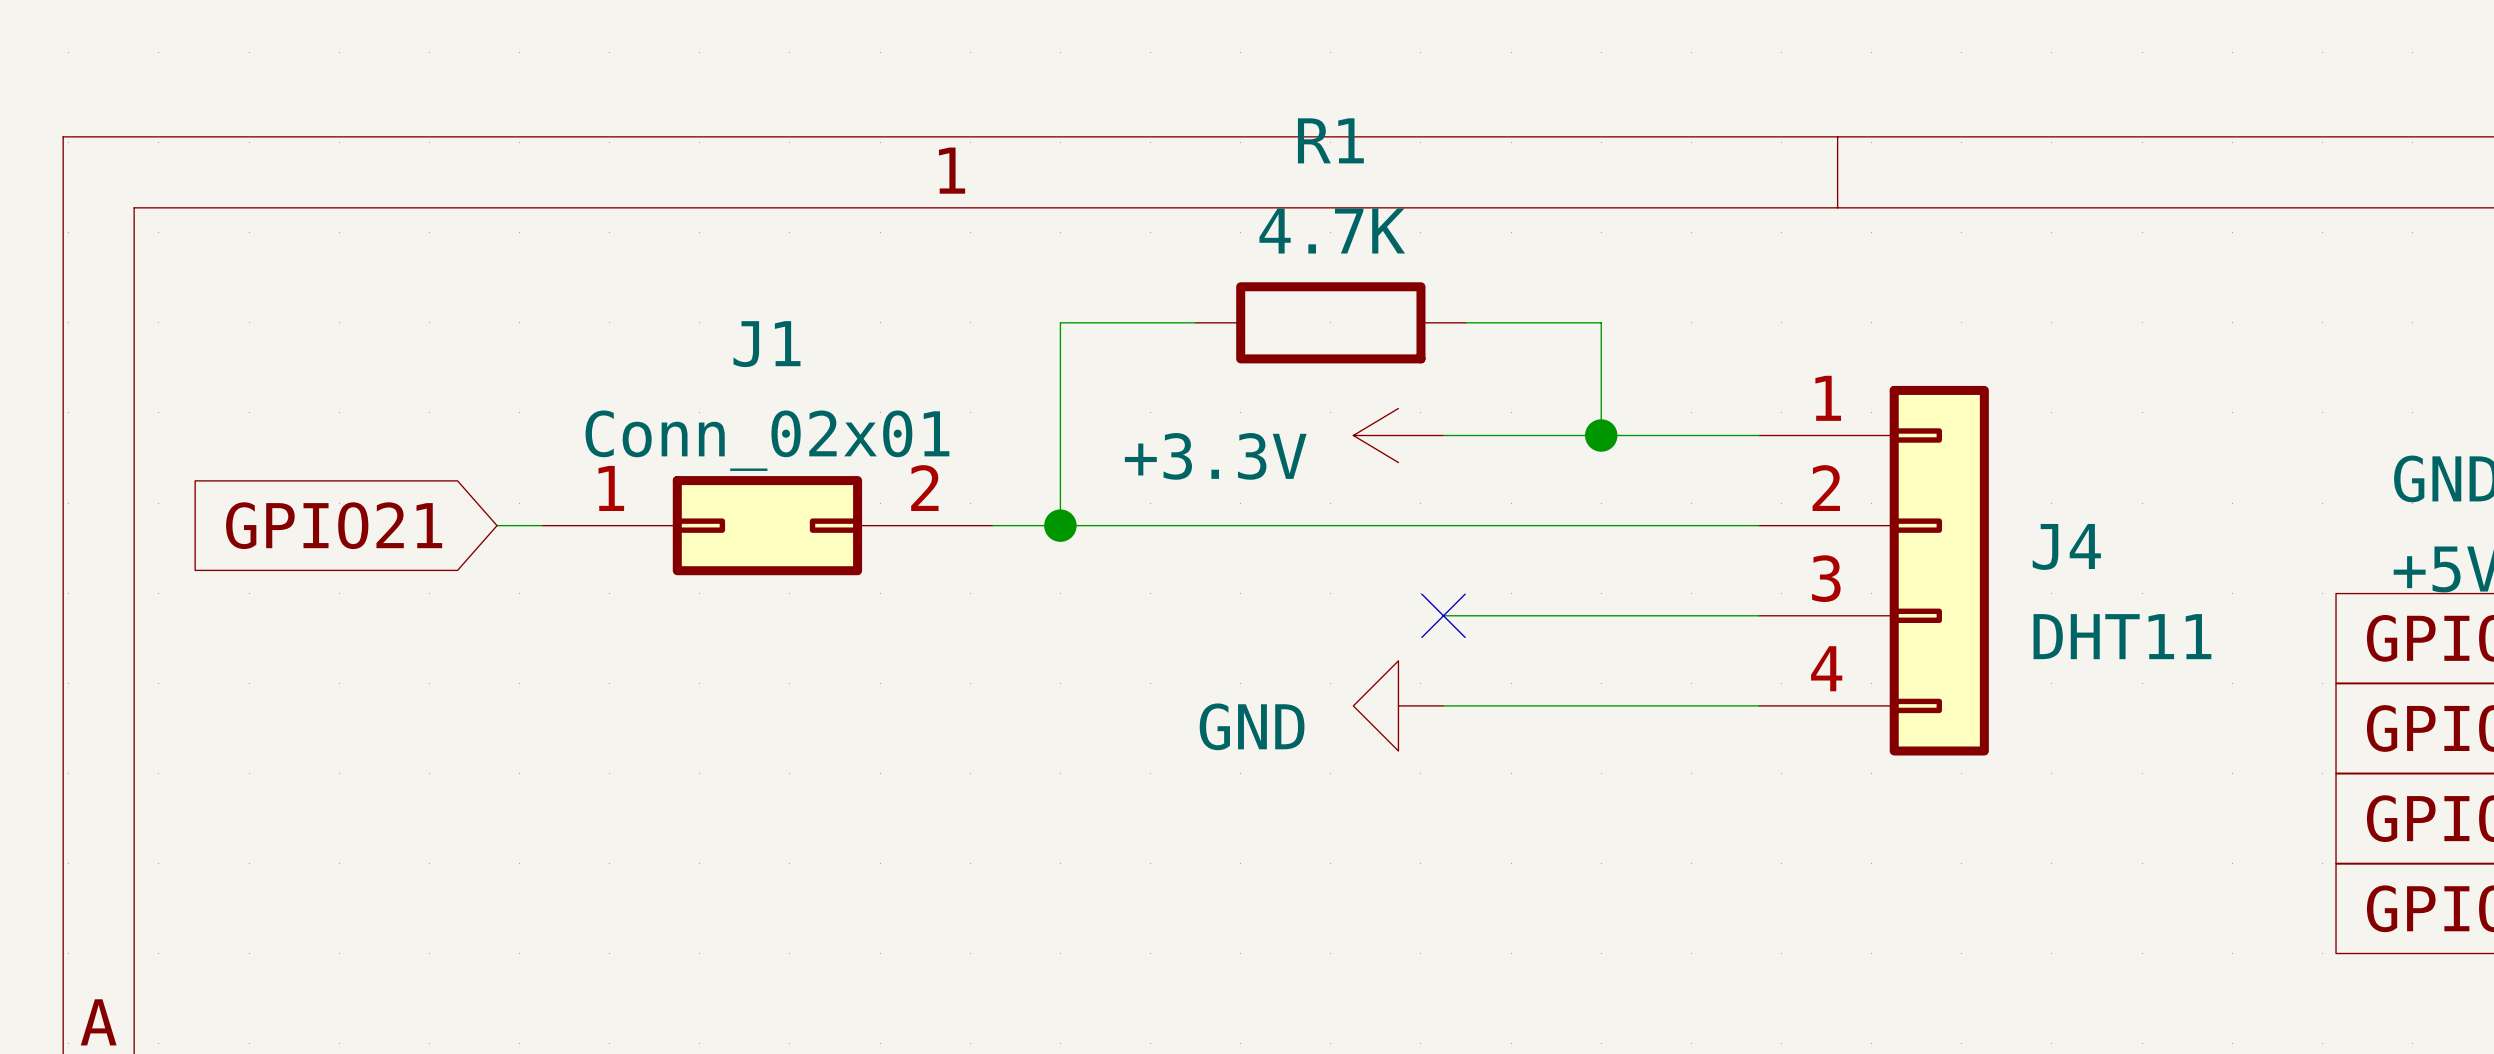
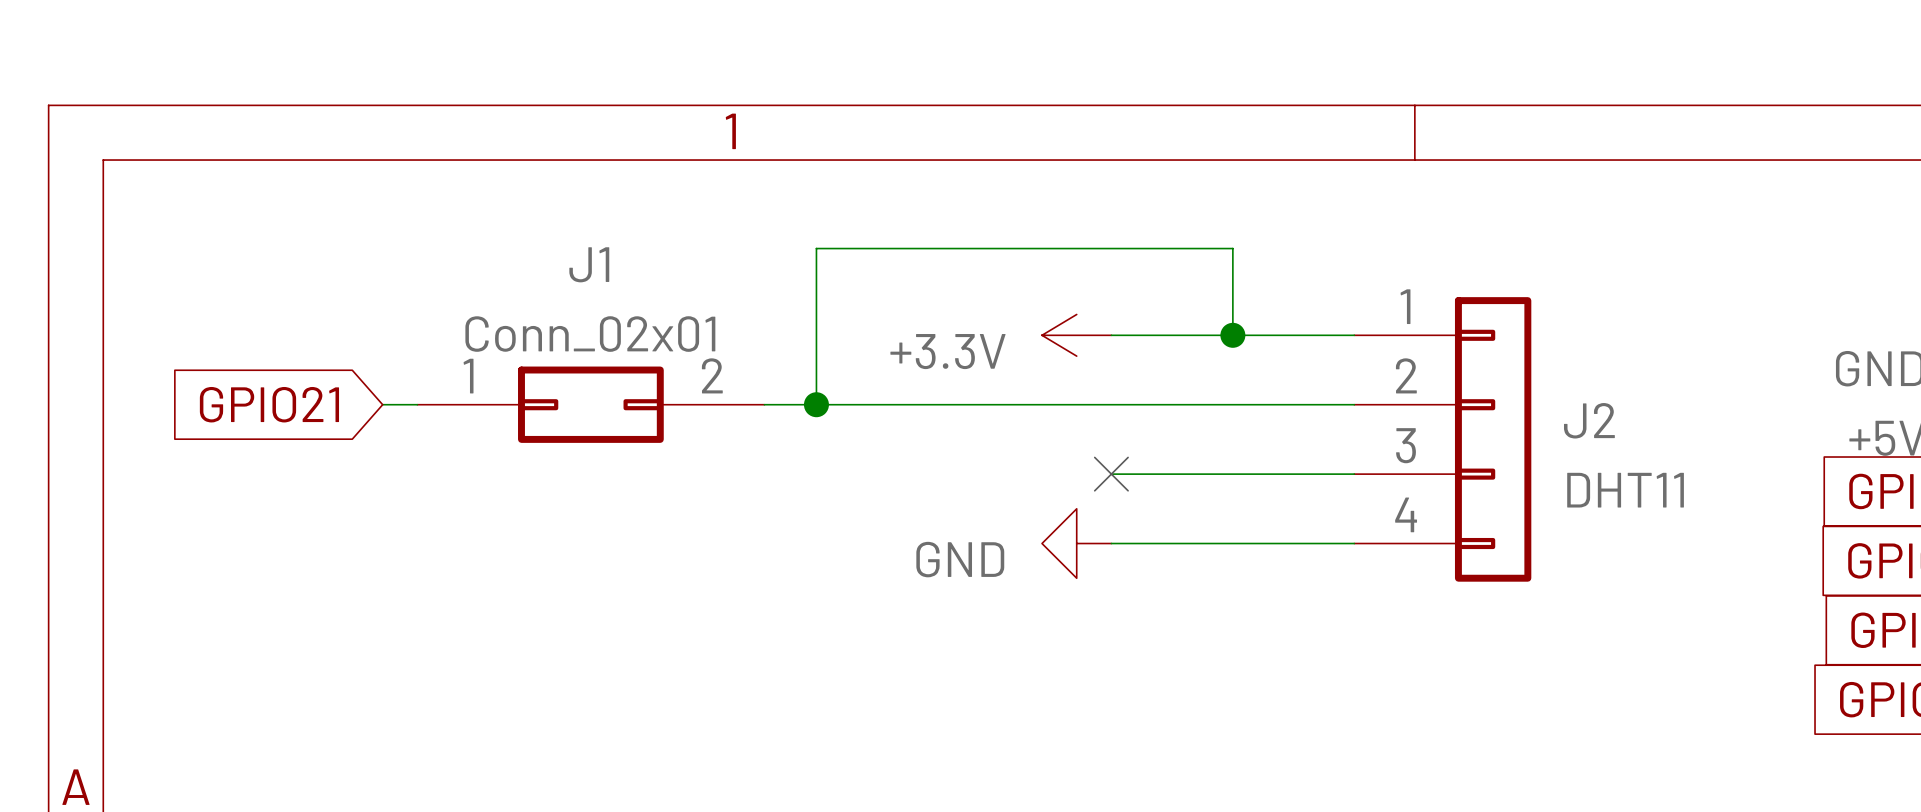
wire: none -> (920, 248) (1128, 248)
R1: 4.7K (1330, 322) -> none
J4 name: J4 (2066, 546) -> J2 (1589, 420)

